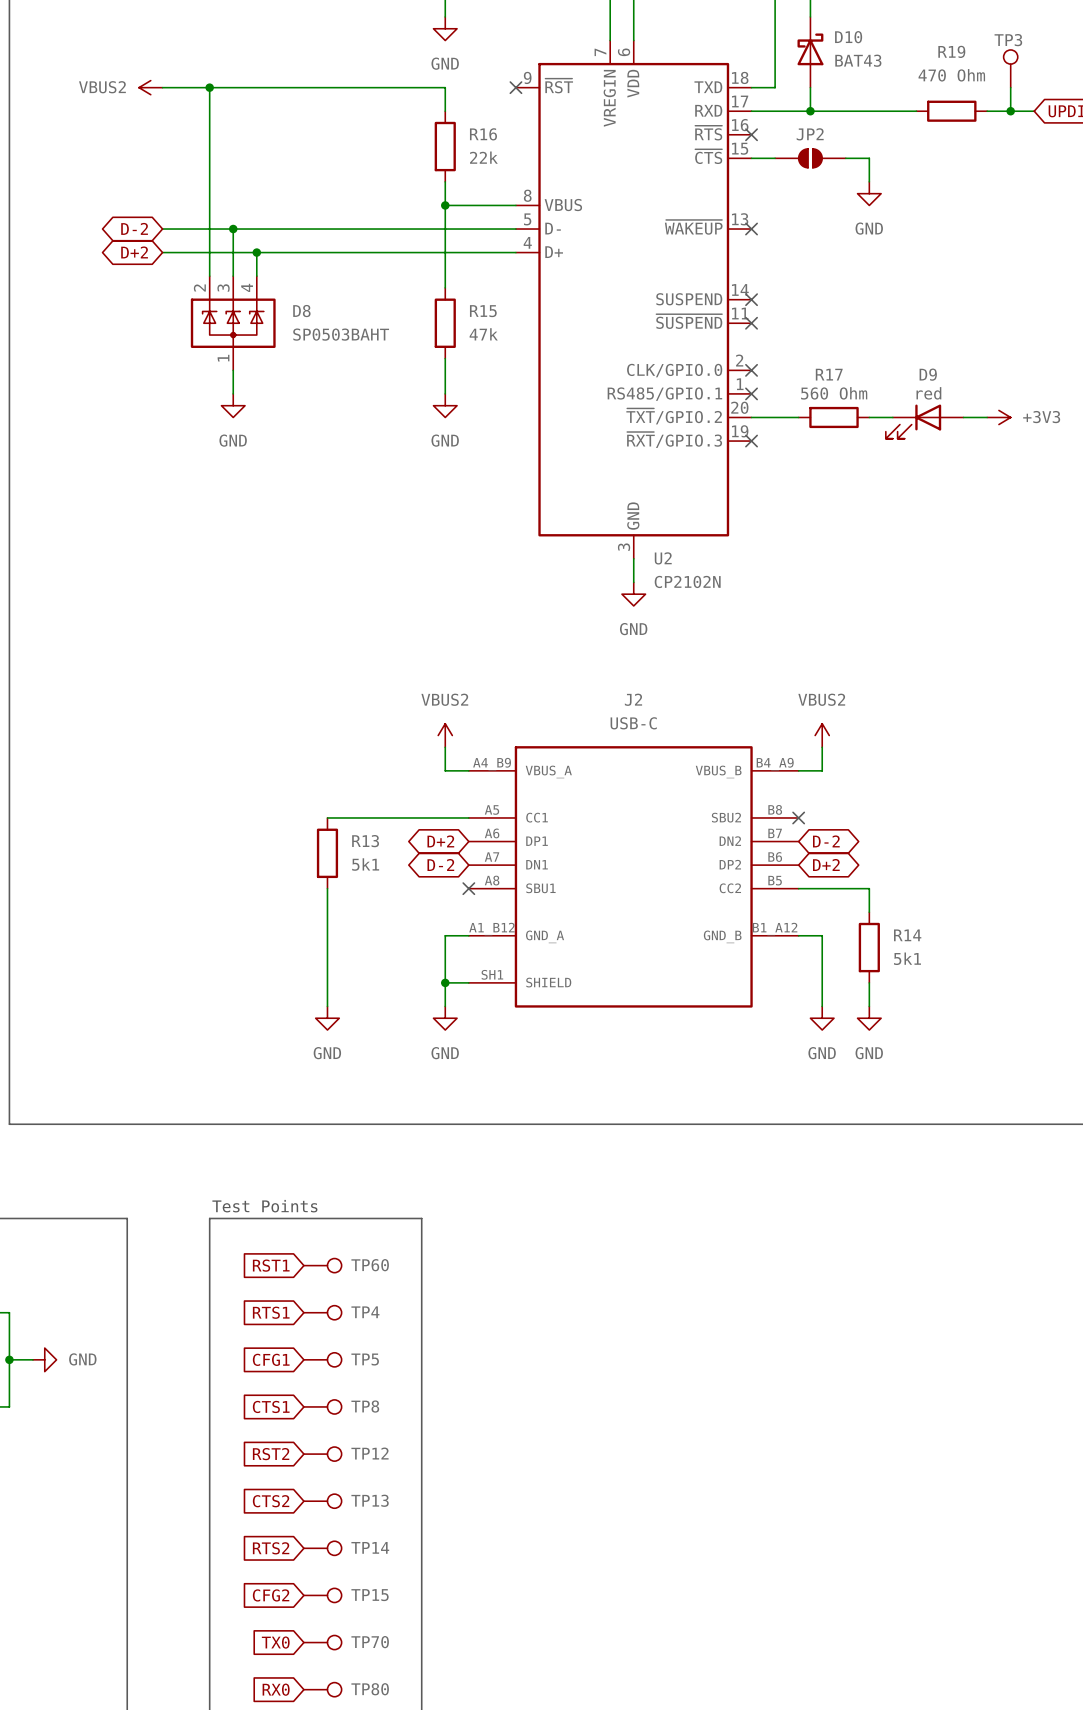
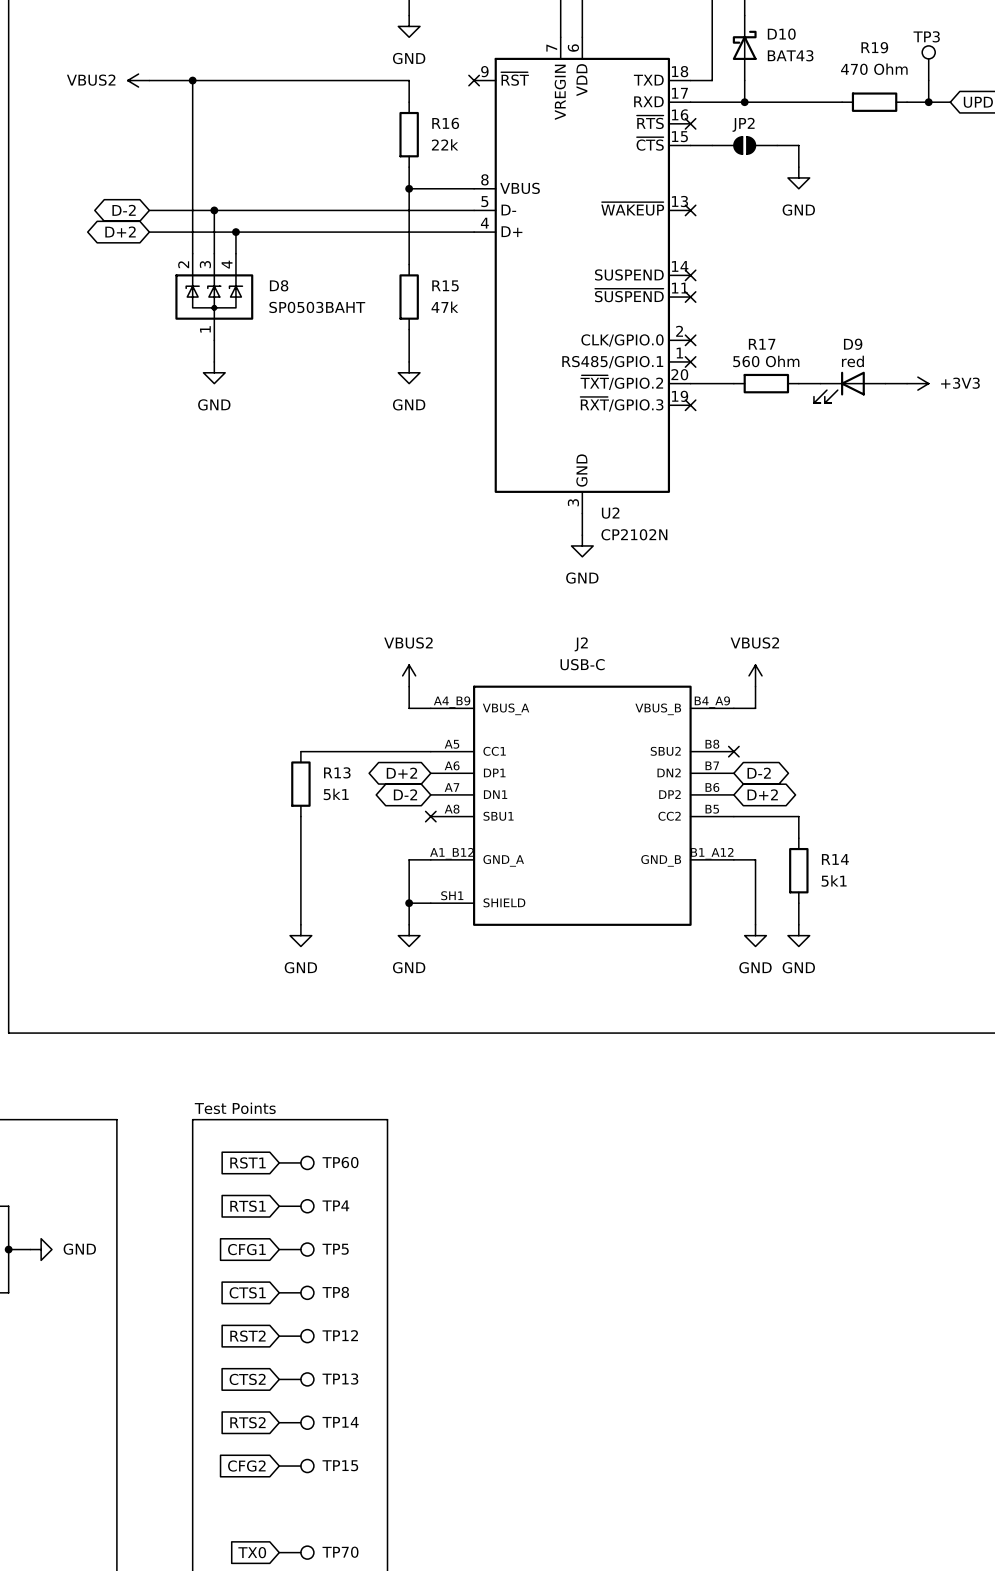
global label: TX0 (275, 1642) -> none
TP70: (322, 1642) -> none
global label: RX0 (276, 1689) -> TX0 (252, 1552)
TP80 name: TP80 (370, 1689) -> TP70 (340, 1552)

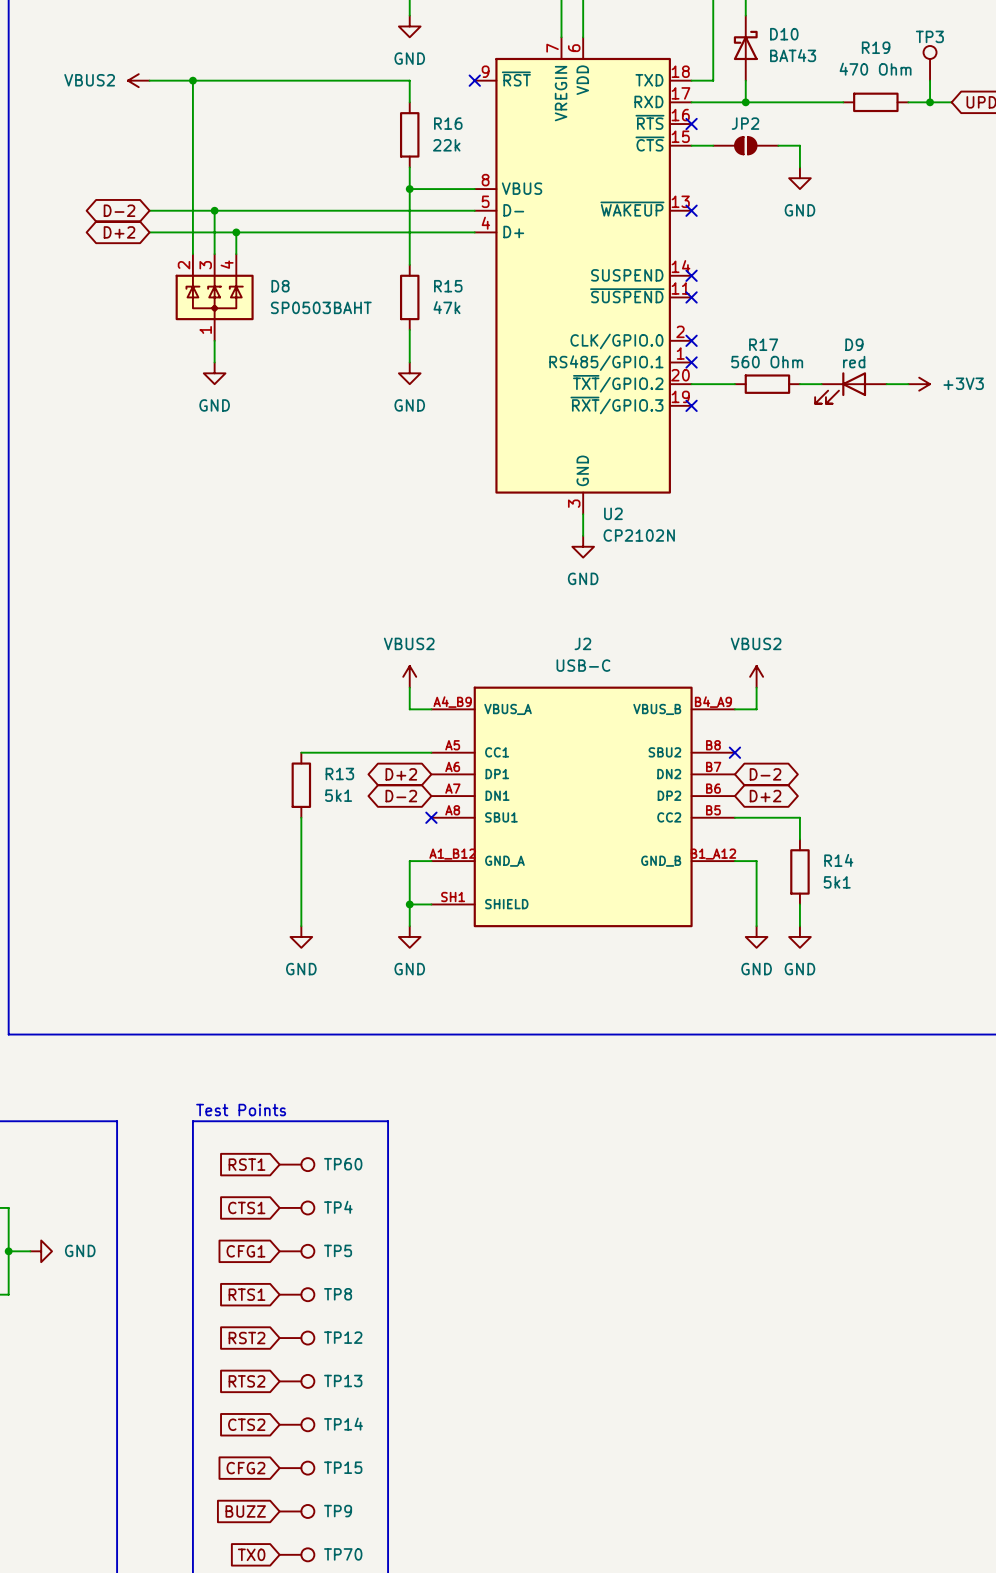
global label: RTS1 (248, 1206) -> CTS1 (246, 1207)
global label: CTS1 (247, 1292) -> RTS1 (247, 1294)
global label: CTS2 (247, 1379) -> RTS2 (247, 1381)
global label: RTS2 (247, 1422) -> CTS2 (246, 1424)
global label: none -> BUZZ (245, 1511)
TP9: none -> (297, 1511)

